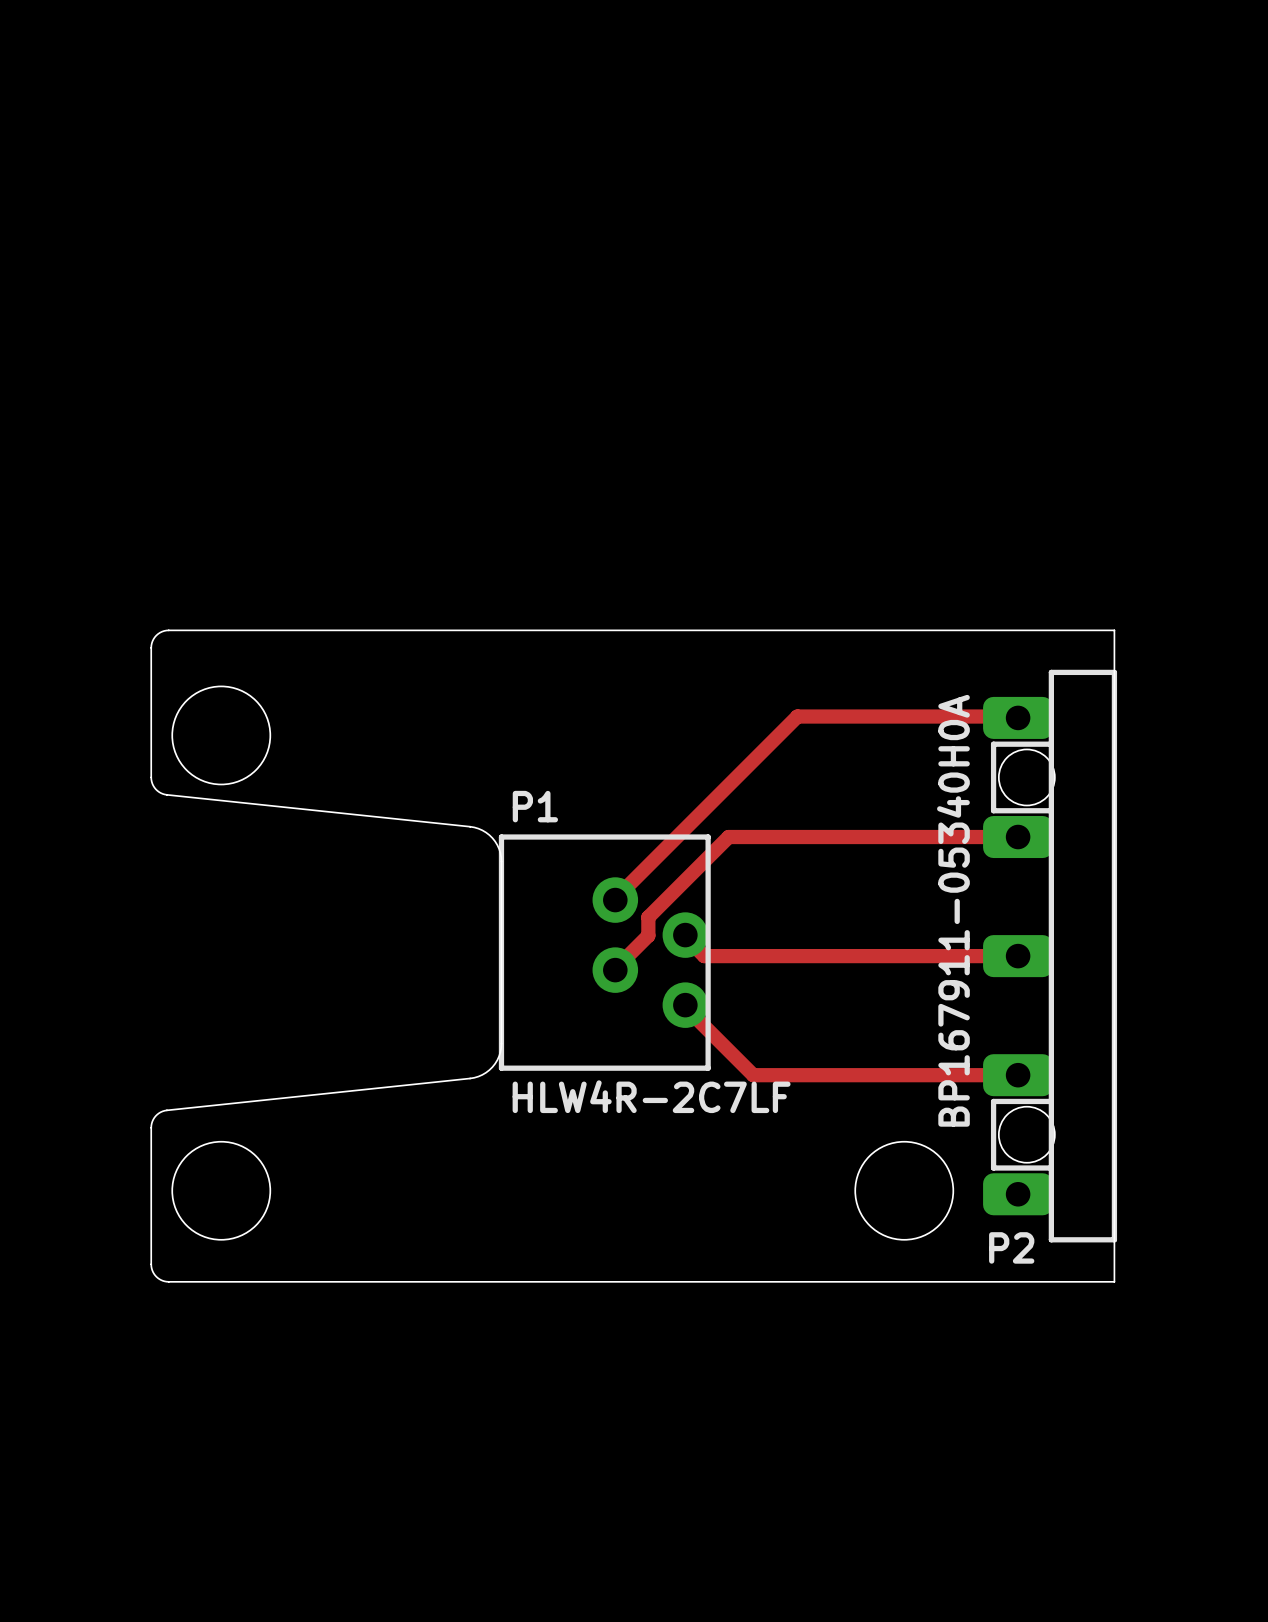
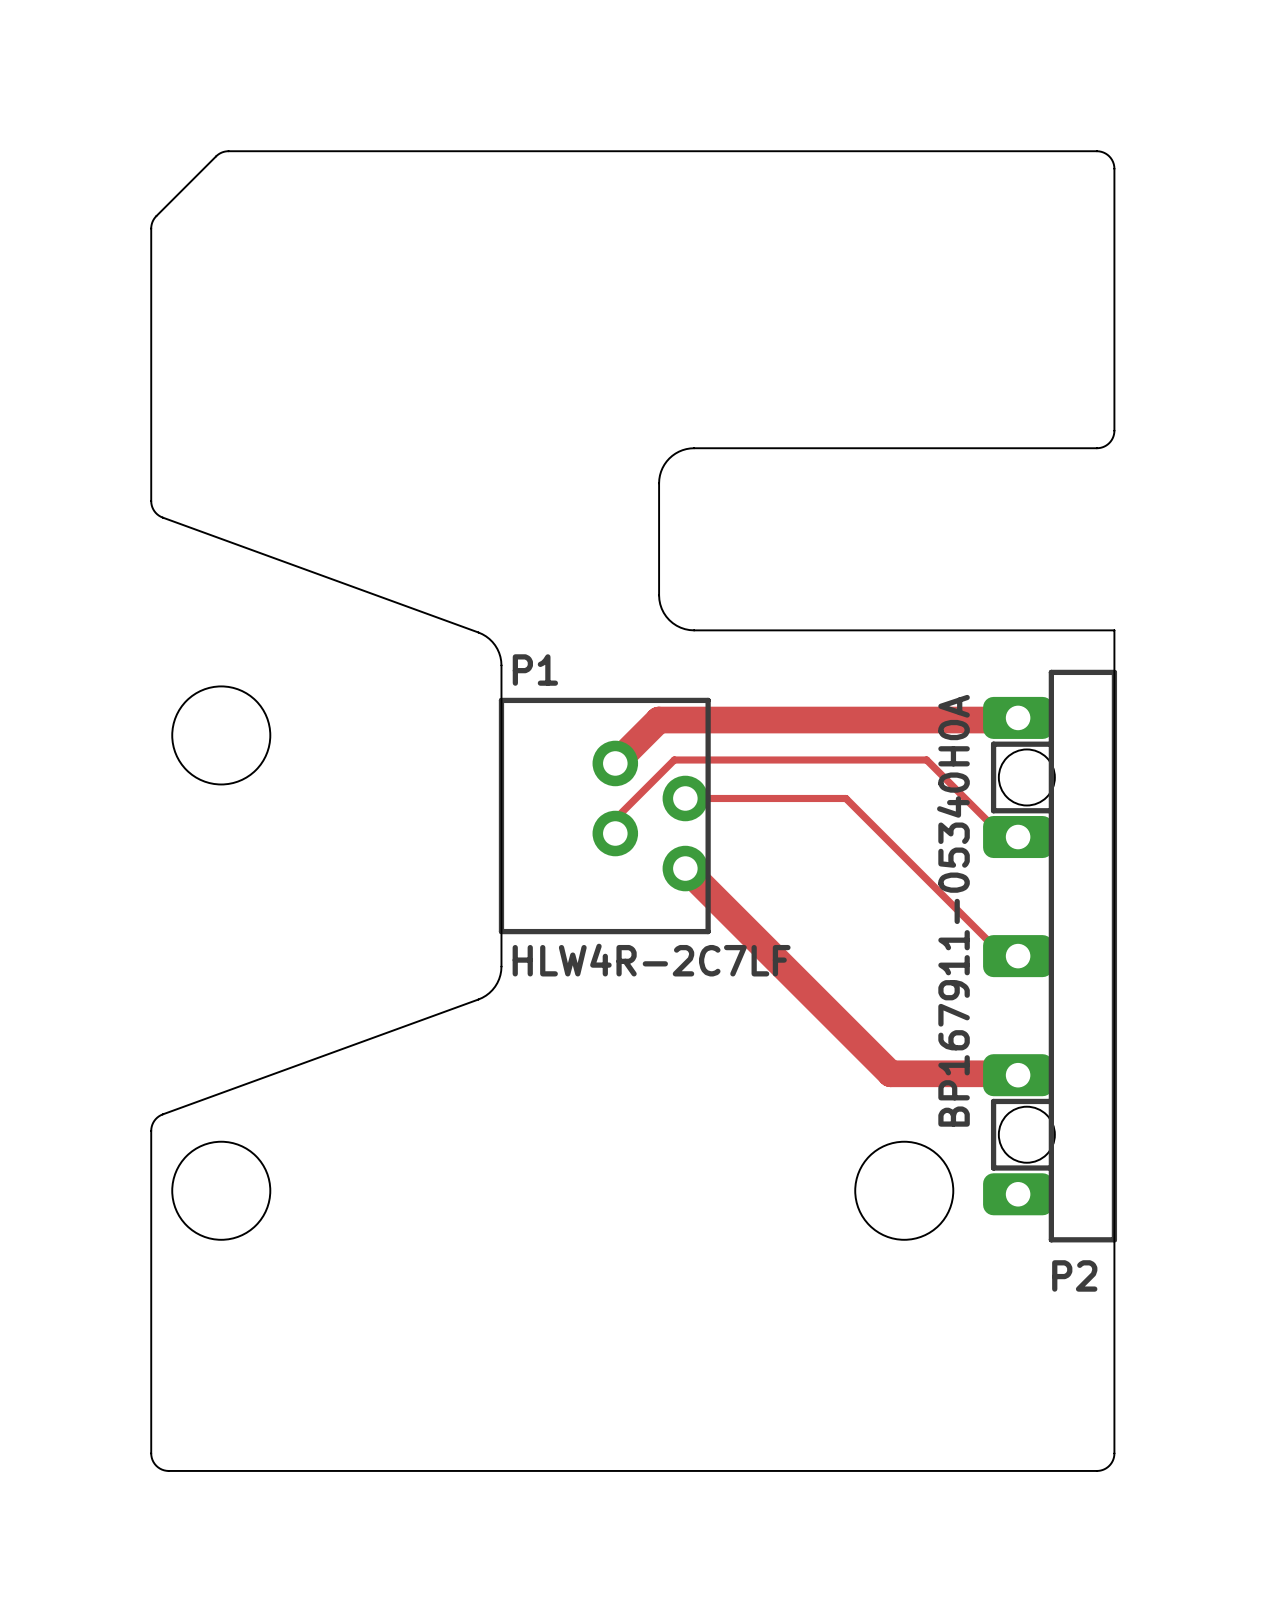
board edge: (694, 630) (168, 630) (159, 632) (153, 639) (151, 647) (151, 777) (153, 785) (158, 791) (166, 794) (474, 827) (486, 832) (495, 841) (499, 848) (501, 861) -> (694, 630) (680, 627) (672, 623) (663, 612) (659, 599) (659, 479) (664, 464) (678, 451) (694, 448) (1096, 448) (1104, 446) (1110, 441) (1114, 430) (1114, 168) (1113, 162) (1107, 154) (1096, 151) (226, 151) (216, 156) (155, 217) (151, 228) (151, 501) (153, 509) (162, 517) (478, 632) (492, 641) (499, 652) (501, 665) (501, 861)
top track: (1018, 717) (797, 716) (615, 898) -> none
top track: none -> (1018, 720) (658, 720) (615, 763)
top track: none -> (685, 798) (845, 798) (1005, 958)
top track: none -> (615, 833) (615, 819) (674, 759) (926, 759) (1002, 835)
top track: (1018, 837) (728, 837) (648, 917) (648, 935) (615, 968) -> none
top track: (685, 937) (704, 956) (1018, 956) -> none
P1 position: (604, 952) -> (604, 816)
board edge: (501, 966) (501, 1047) (495, 1063) (482, 1074) (470, 1078) (164, 1110) (154, 1117) (151, 1130) -> (501, 966) (497, 983) (492, 990) (482, 997) (162, 1114) (154, 1120) (151, 1130)
top track: (685, 1007) (753, 1075) (1018, 1075) -> (685, 868) (890, 1073) (1018, 1073)
P2 name position: P2 (1011, 1247) -> P2 (1074, 1275)
board edge: (151, 1264) (156, 1276) (168, 1281) (1114, 1281) -> (151, 1264) (151, 1455) (156, 1465) (168, 1470) (1100, 1470) (1110, 1464) (1114, 1455) (1114, 1281)

